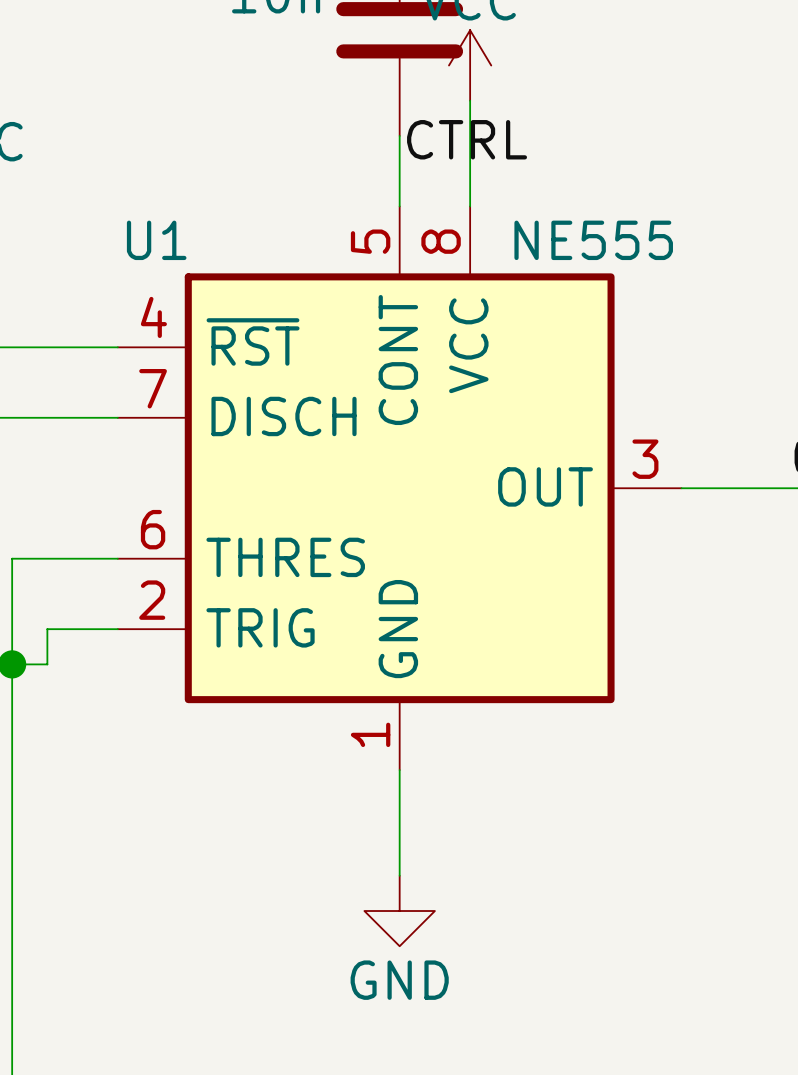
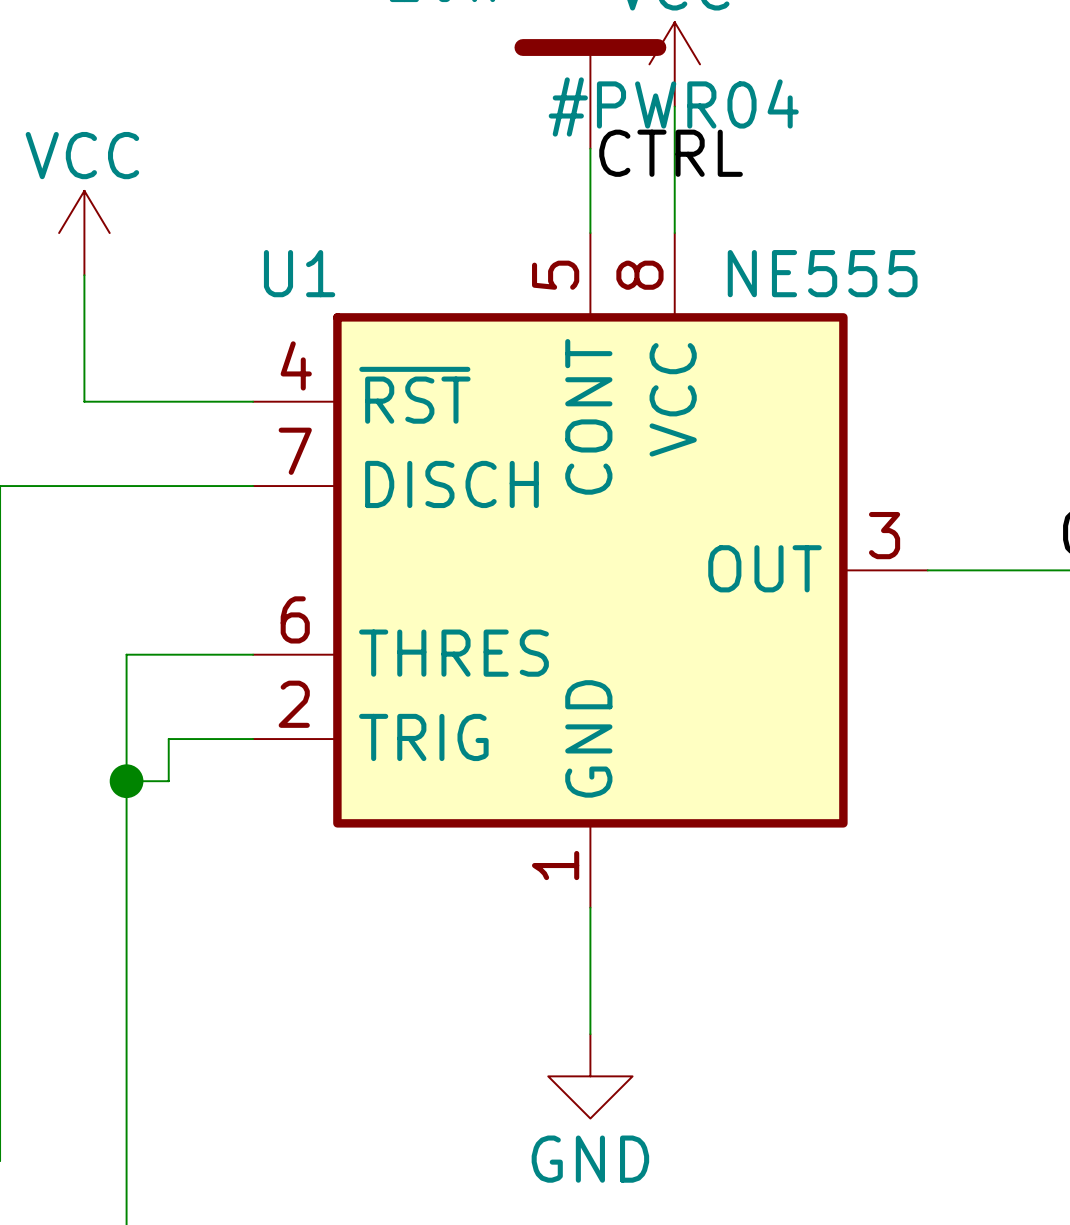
#PWR04 name: none -> #PWR04 (673, 106)

